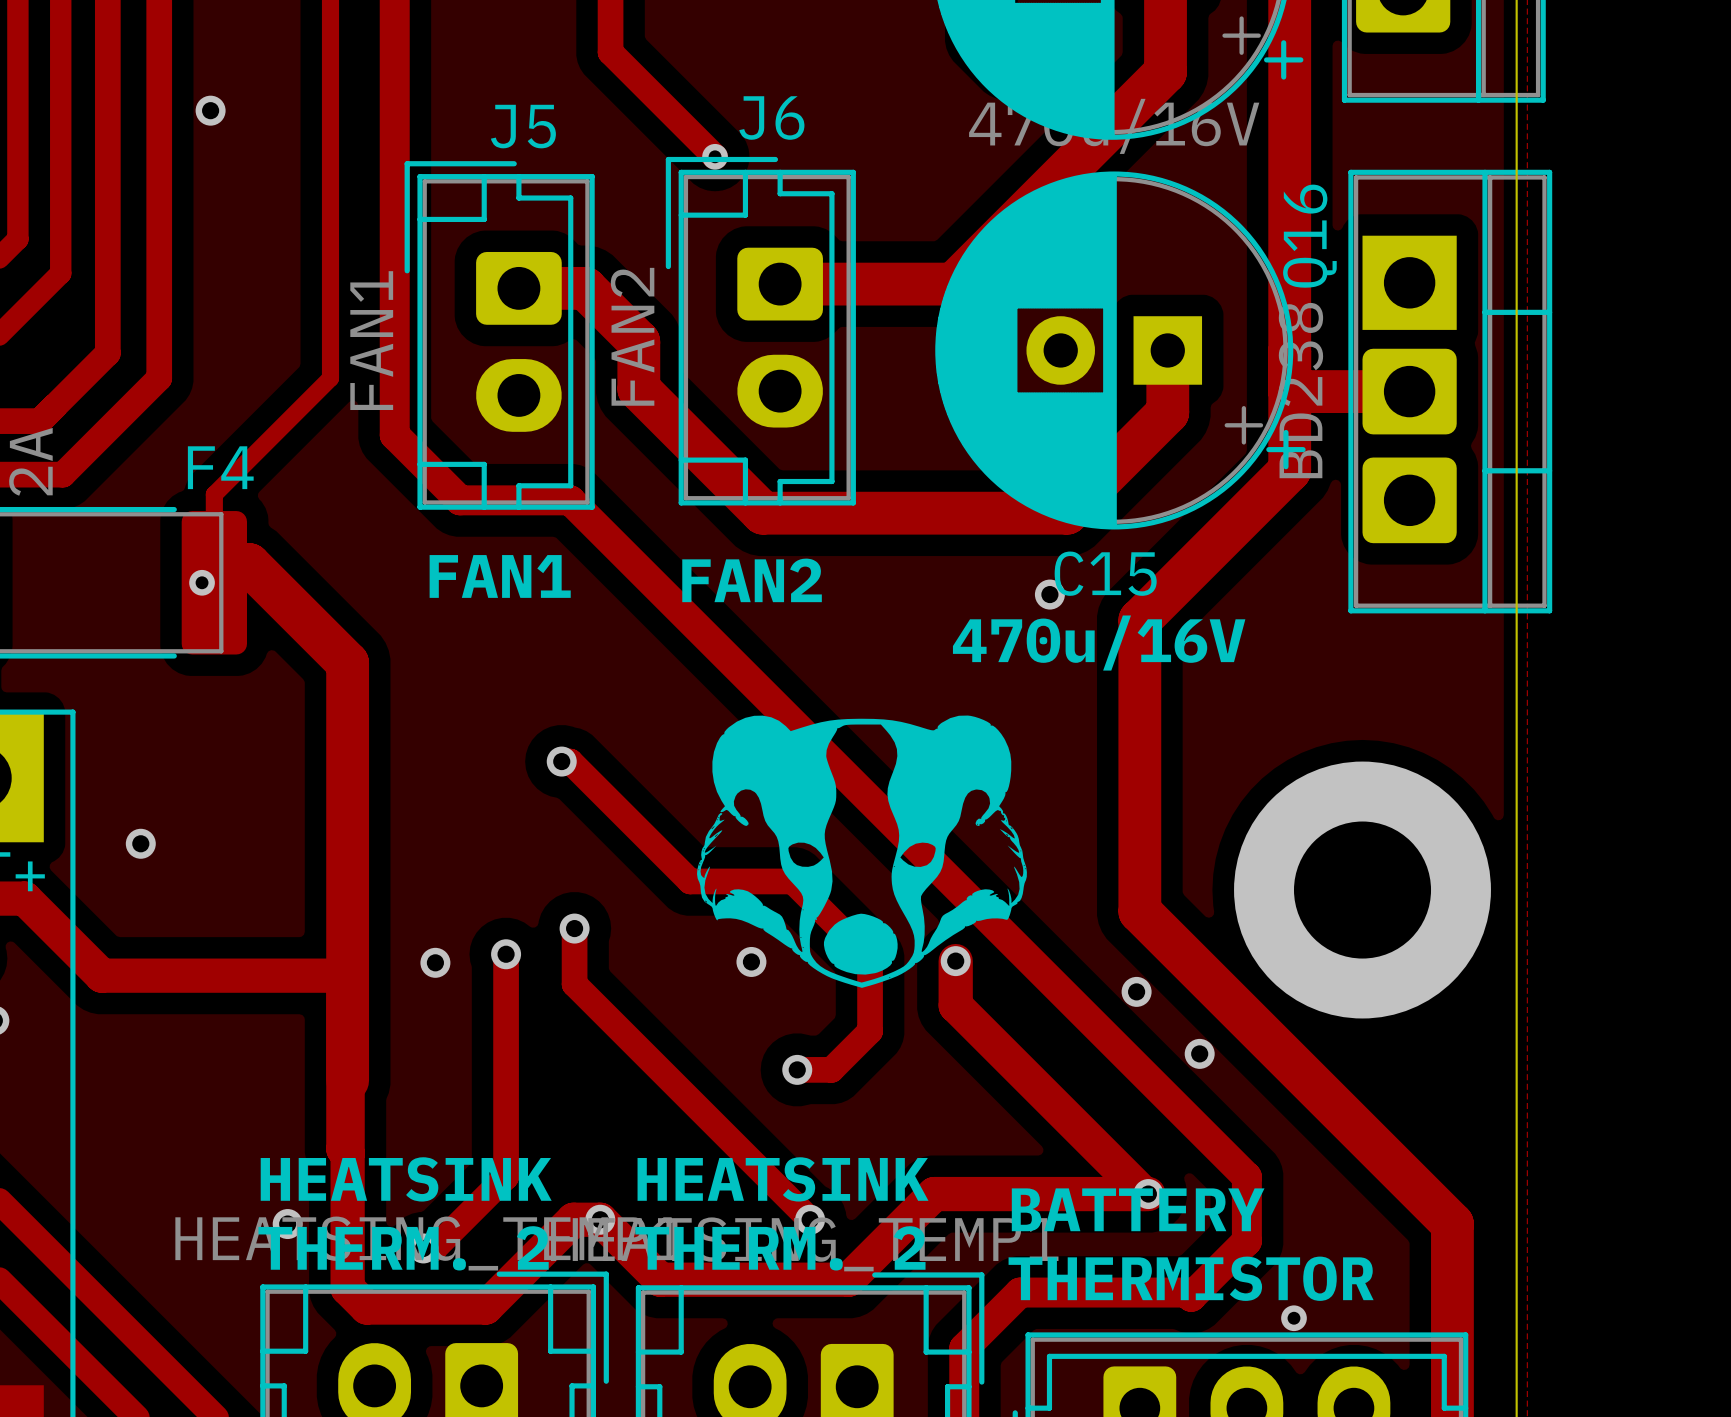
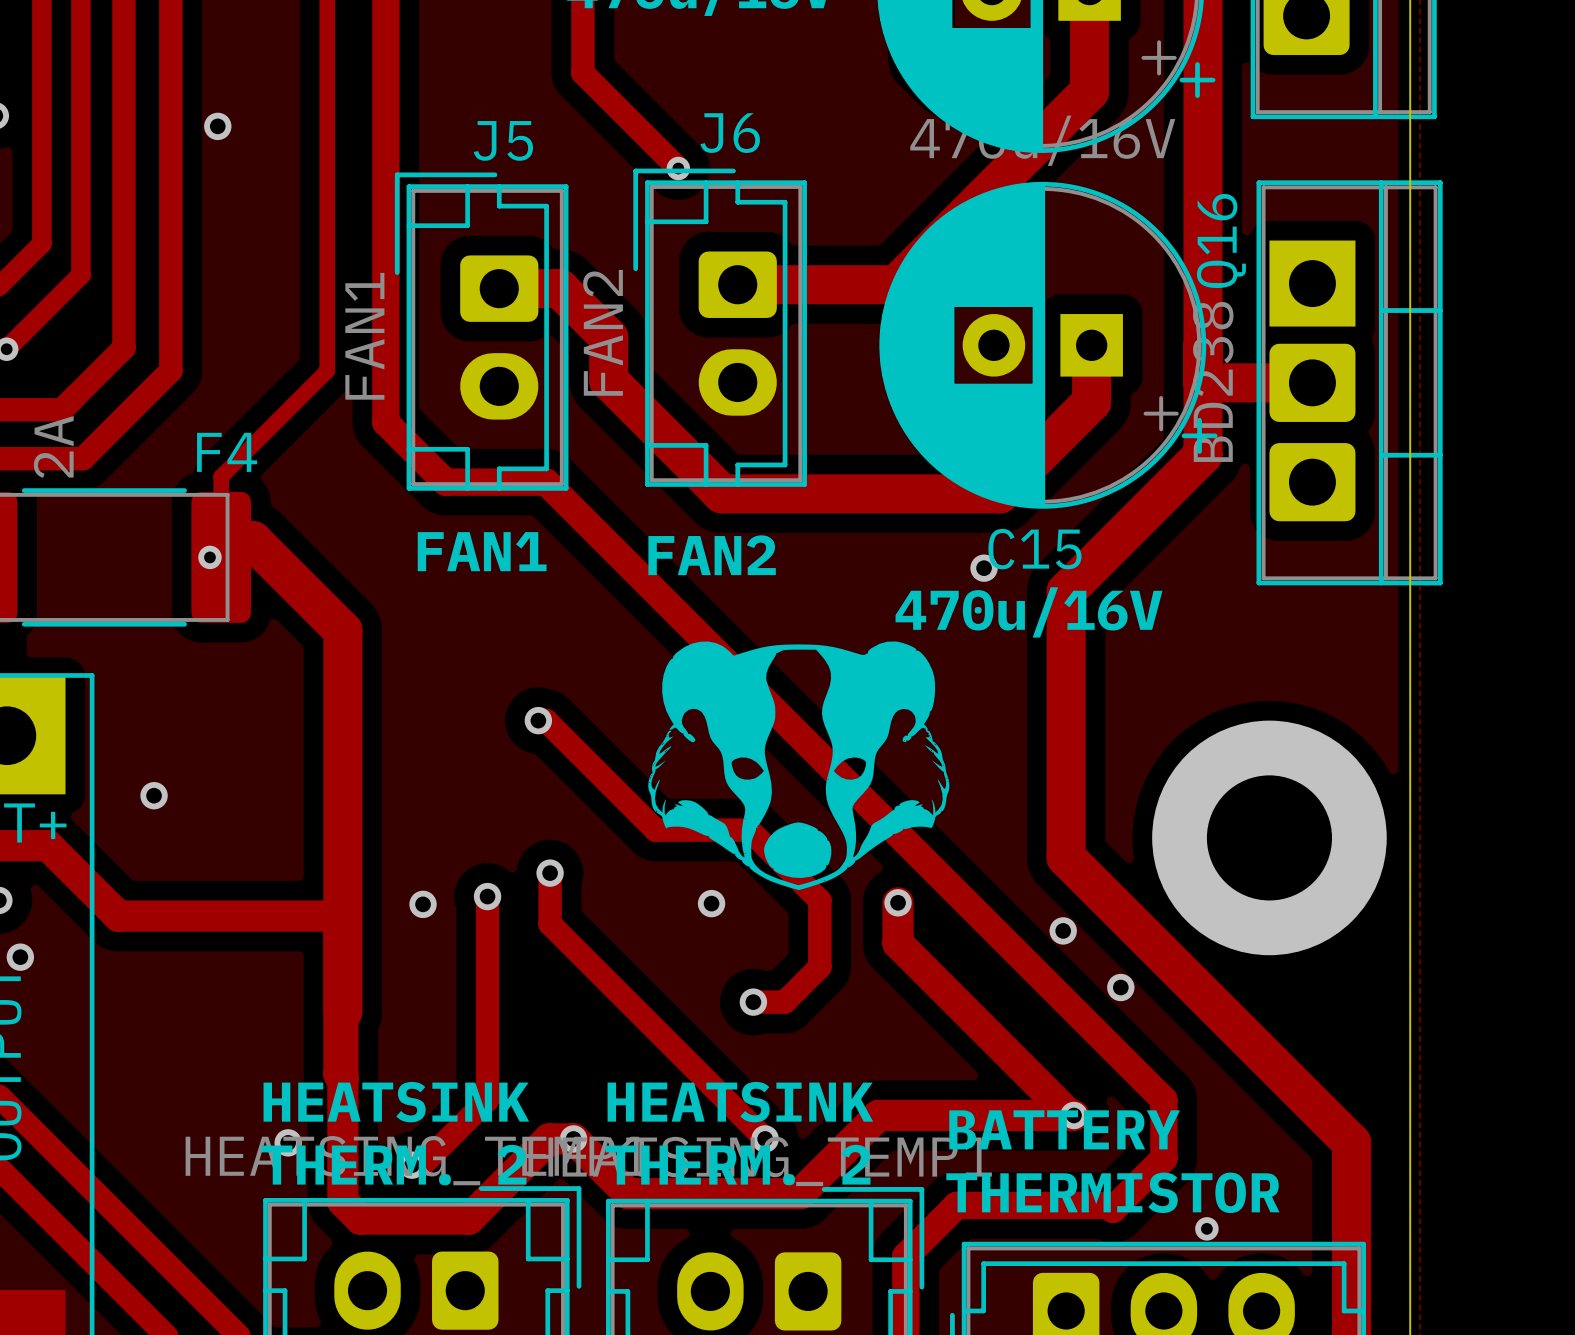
drawing position: (861, 851) -> (798, 765)

